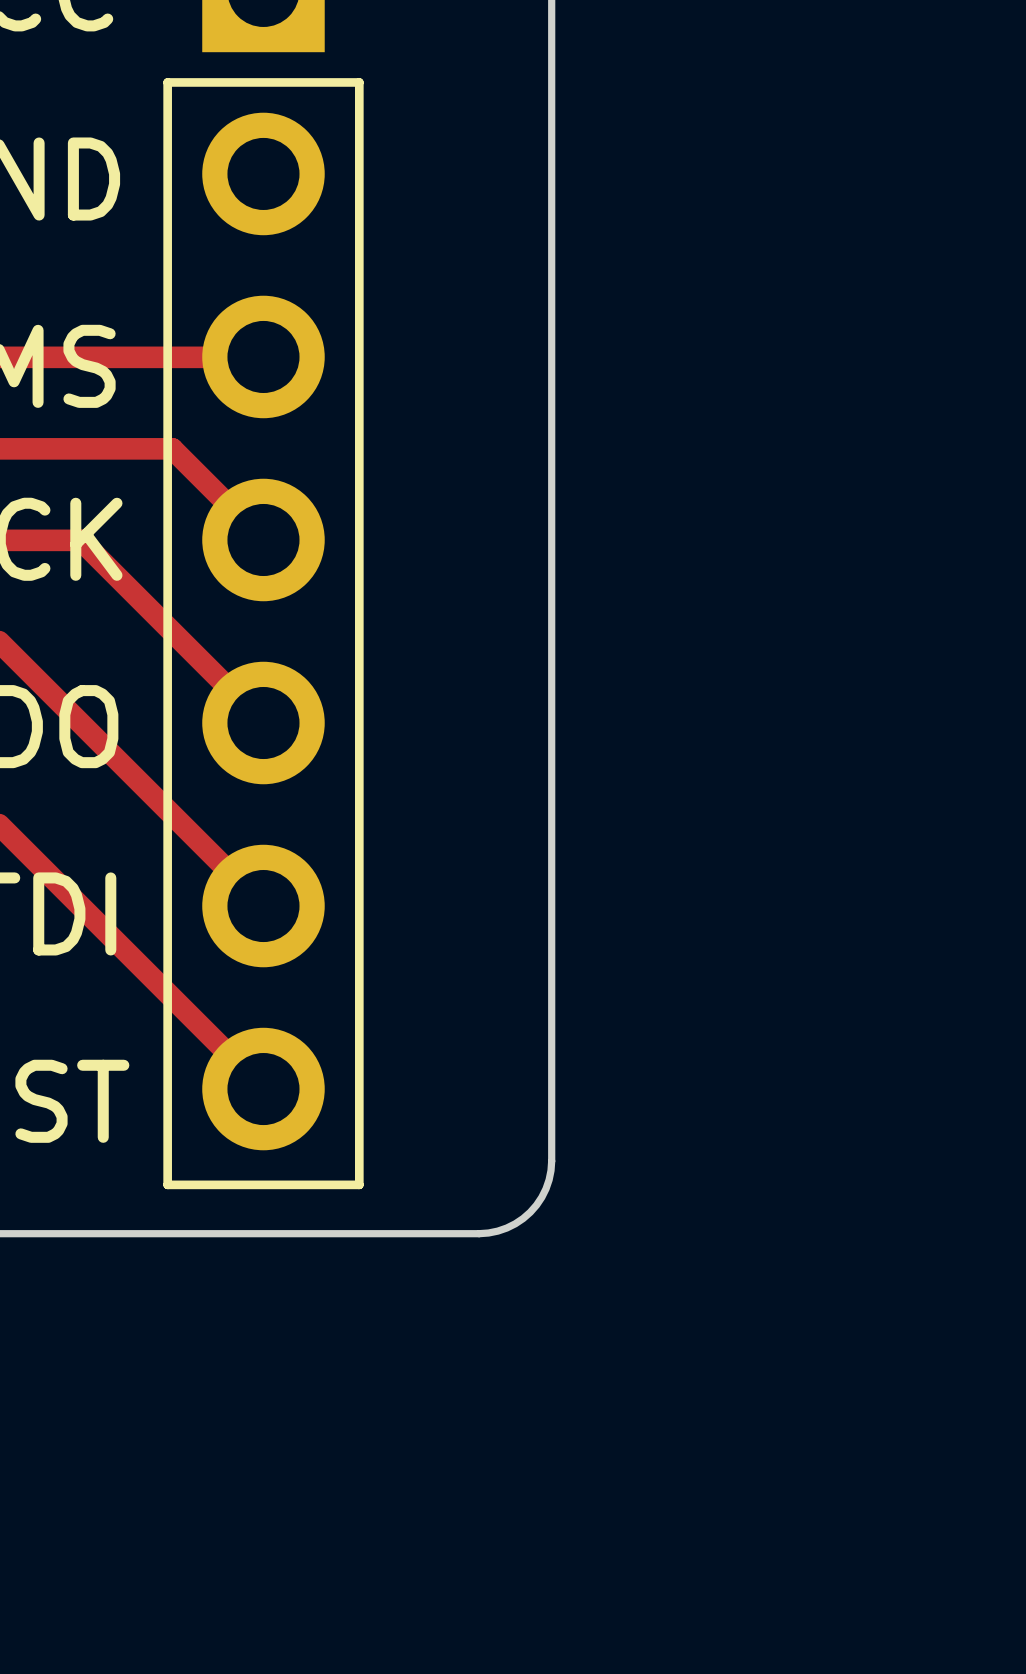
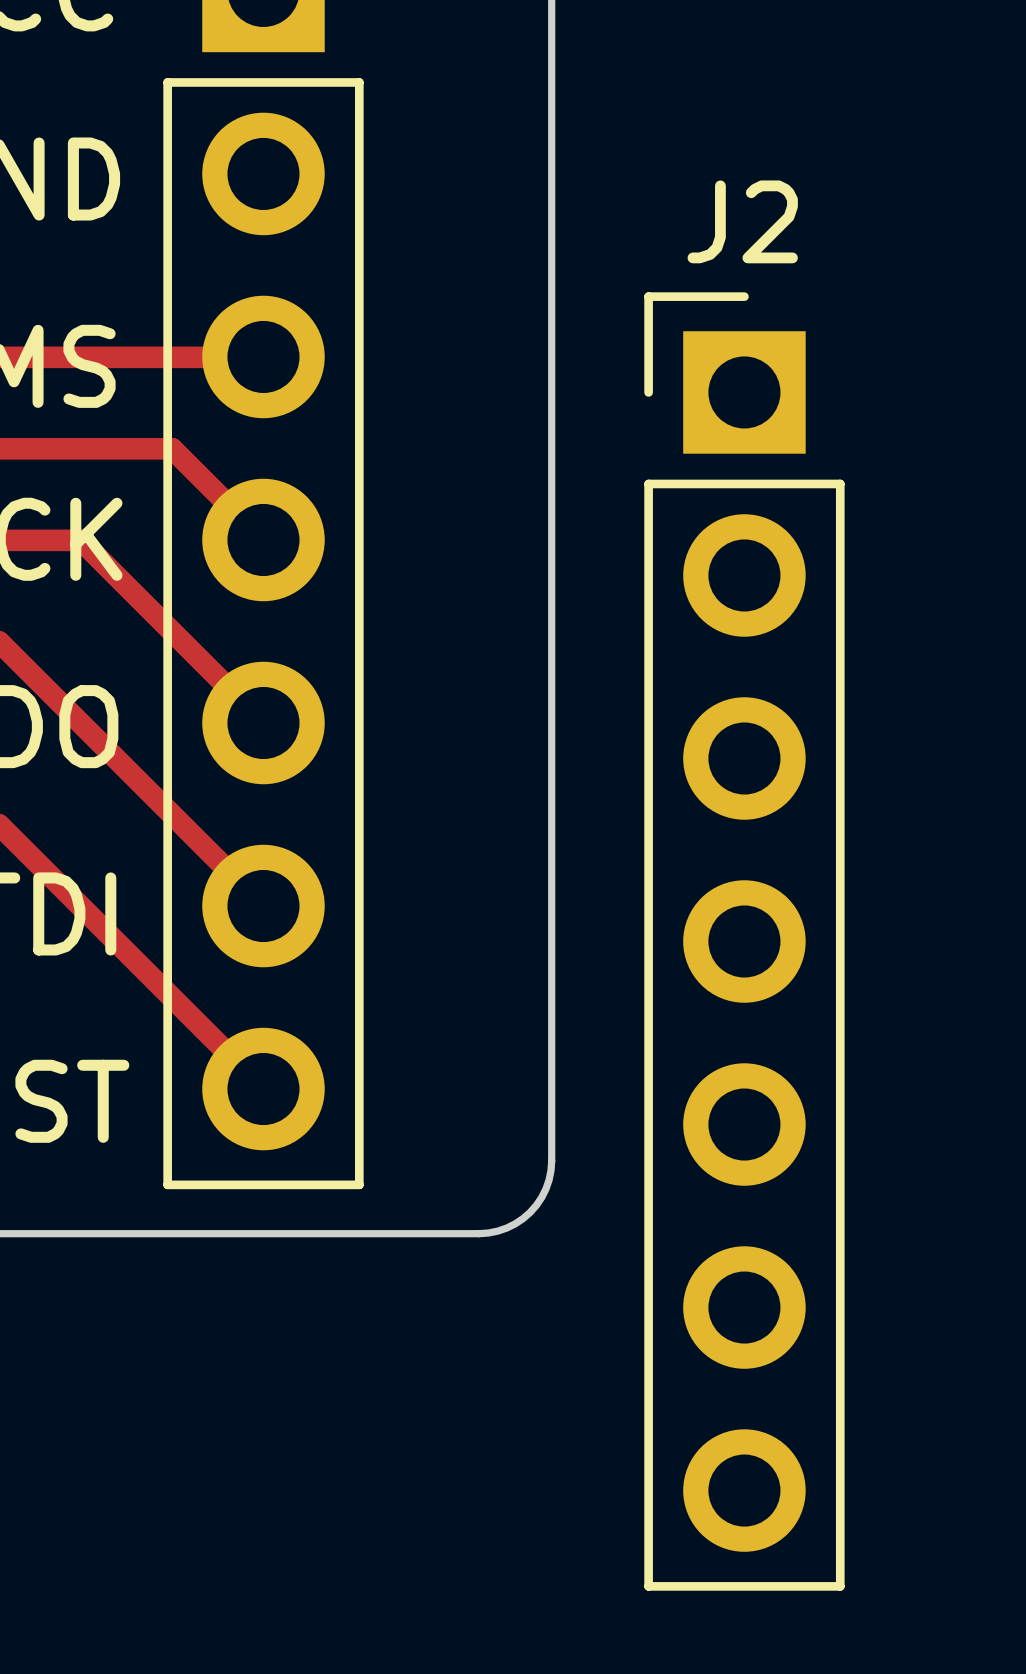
J2: none -> (744, 941)

